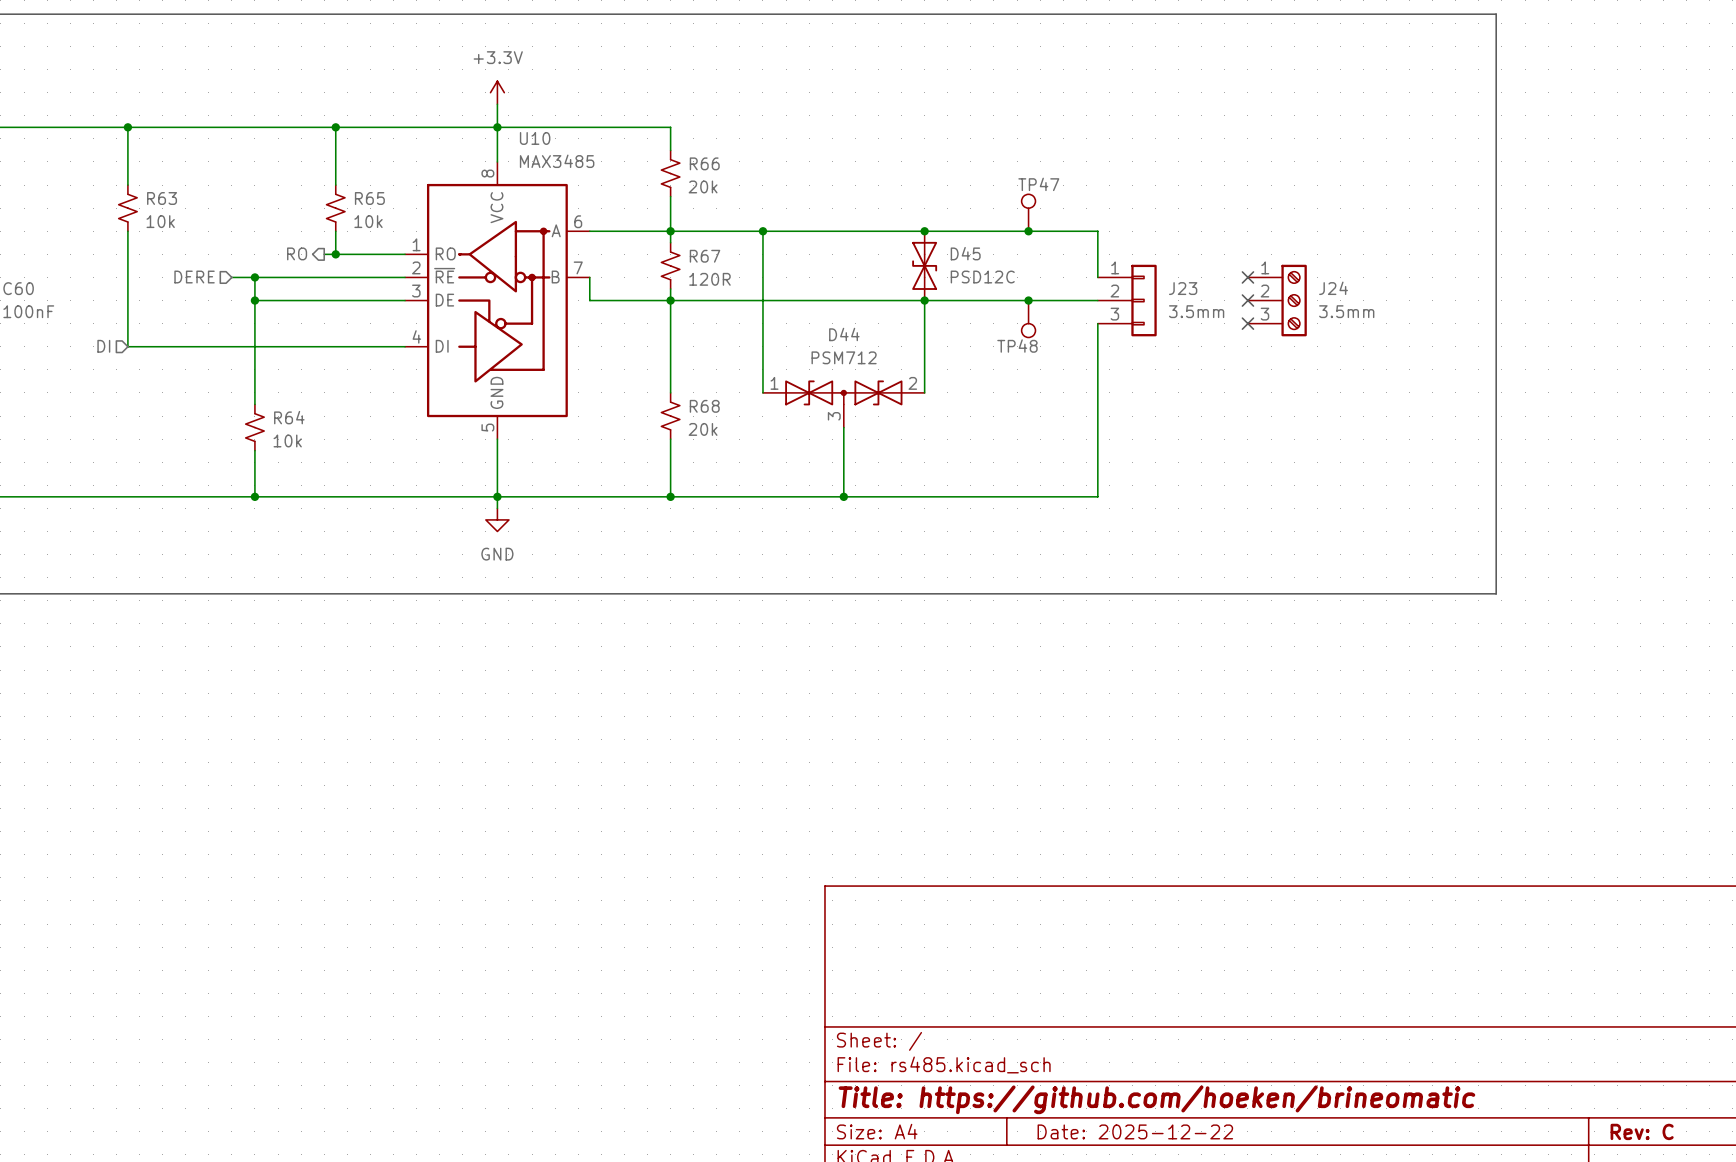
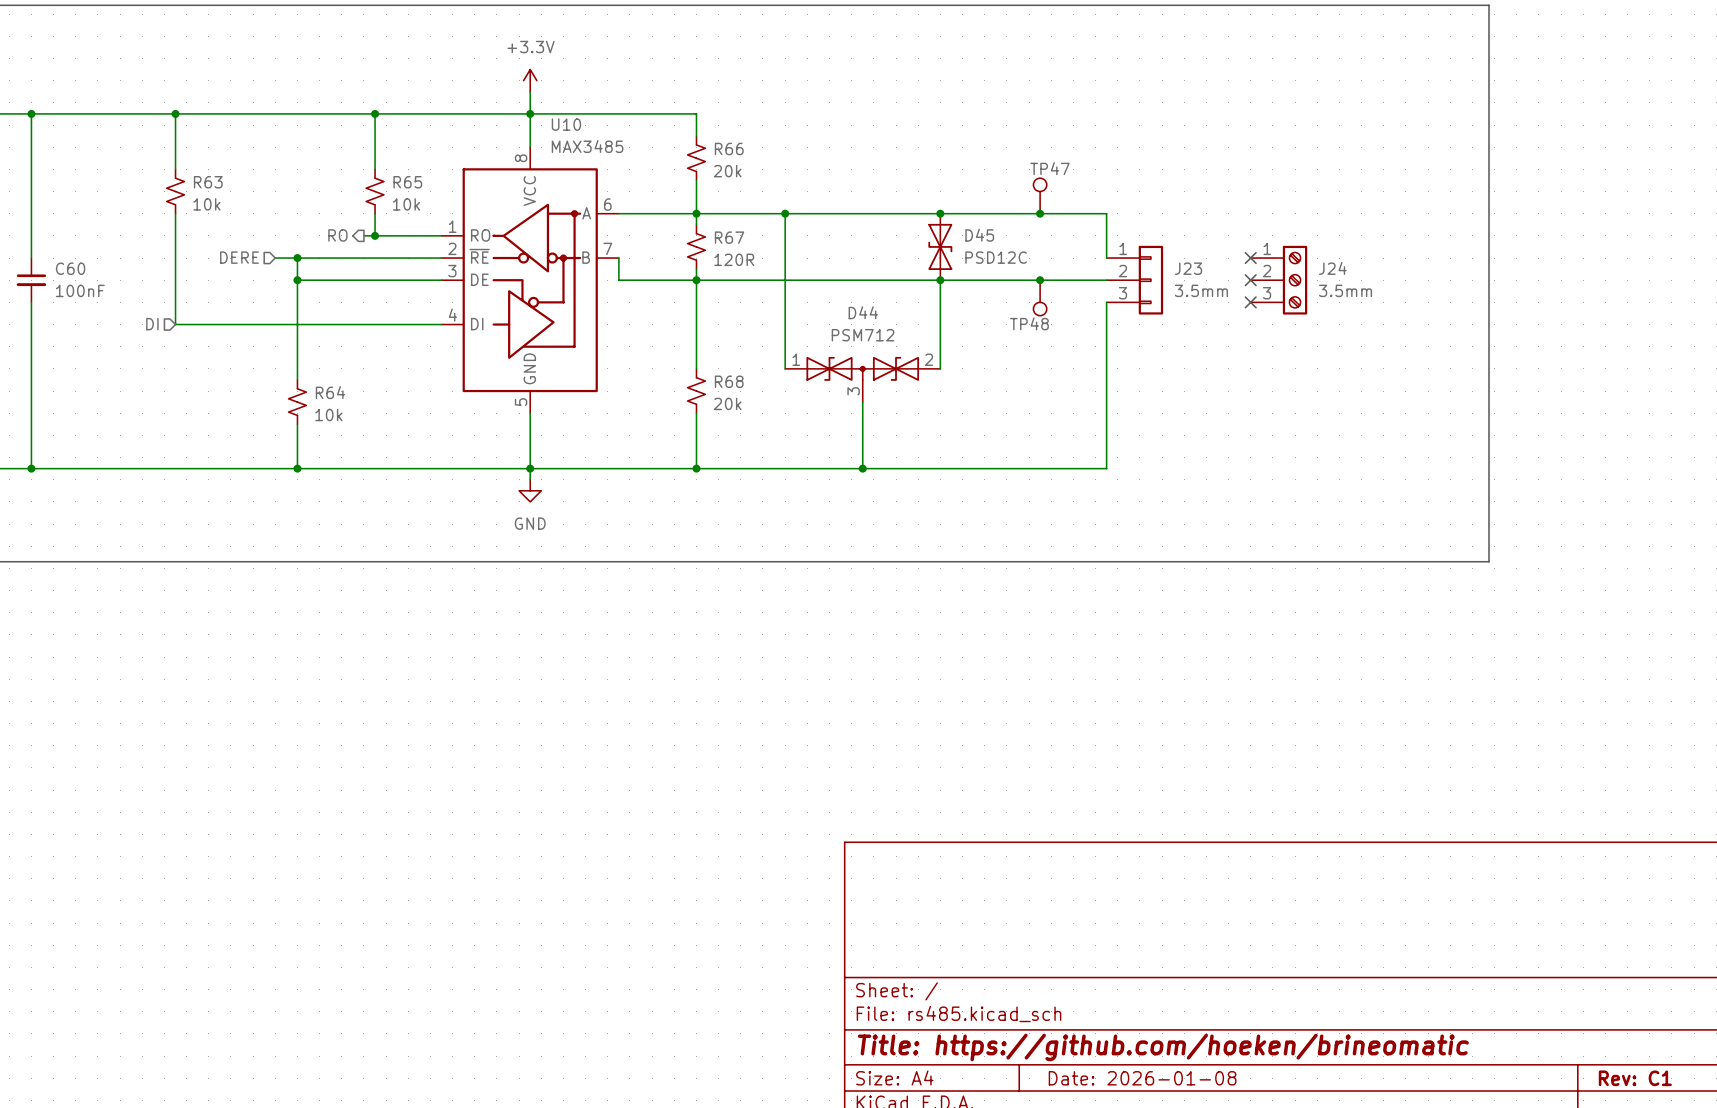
title block: Date: 2025-12-22 (1135, 1131) -> Date: 2026-01-08 (1142, 1078)
title block: Rev: C (1642, 1131) -> Rev: C1 (1635, 1078)

